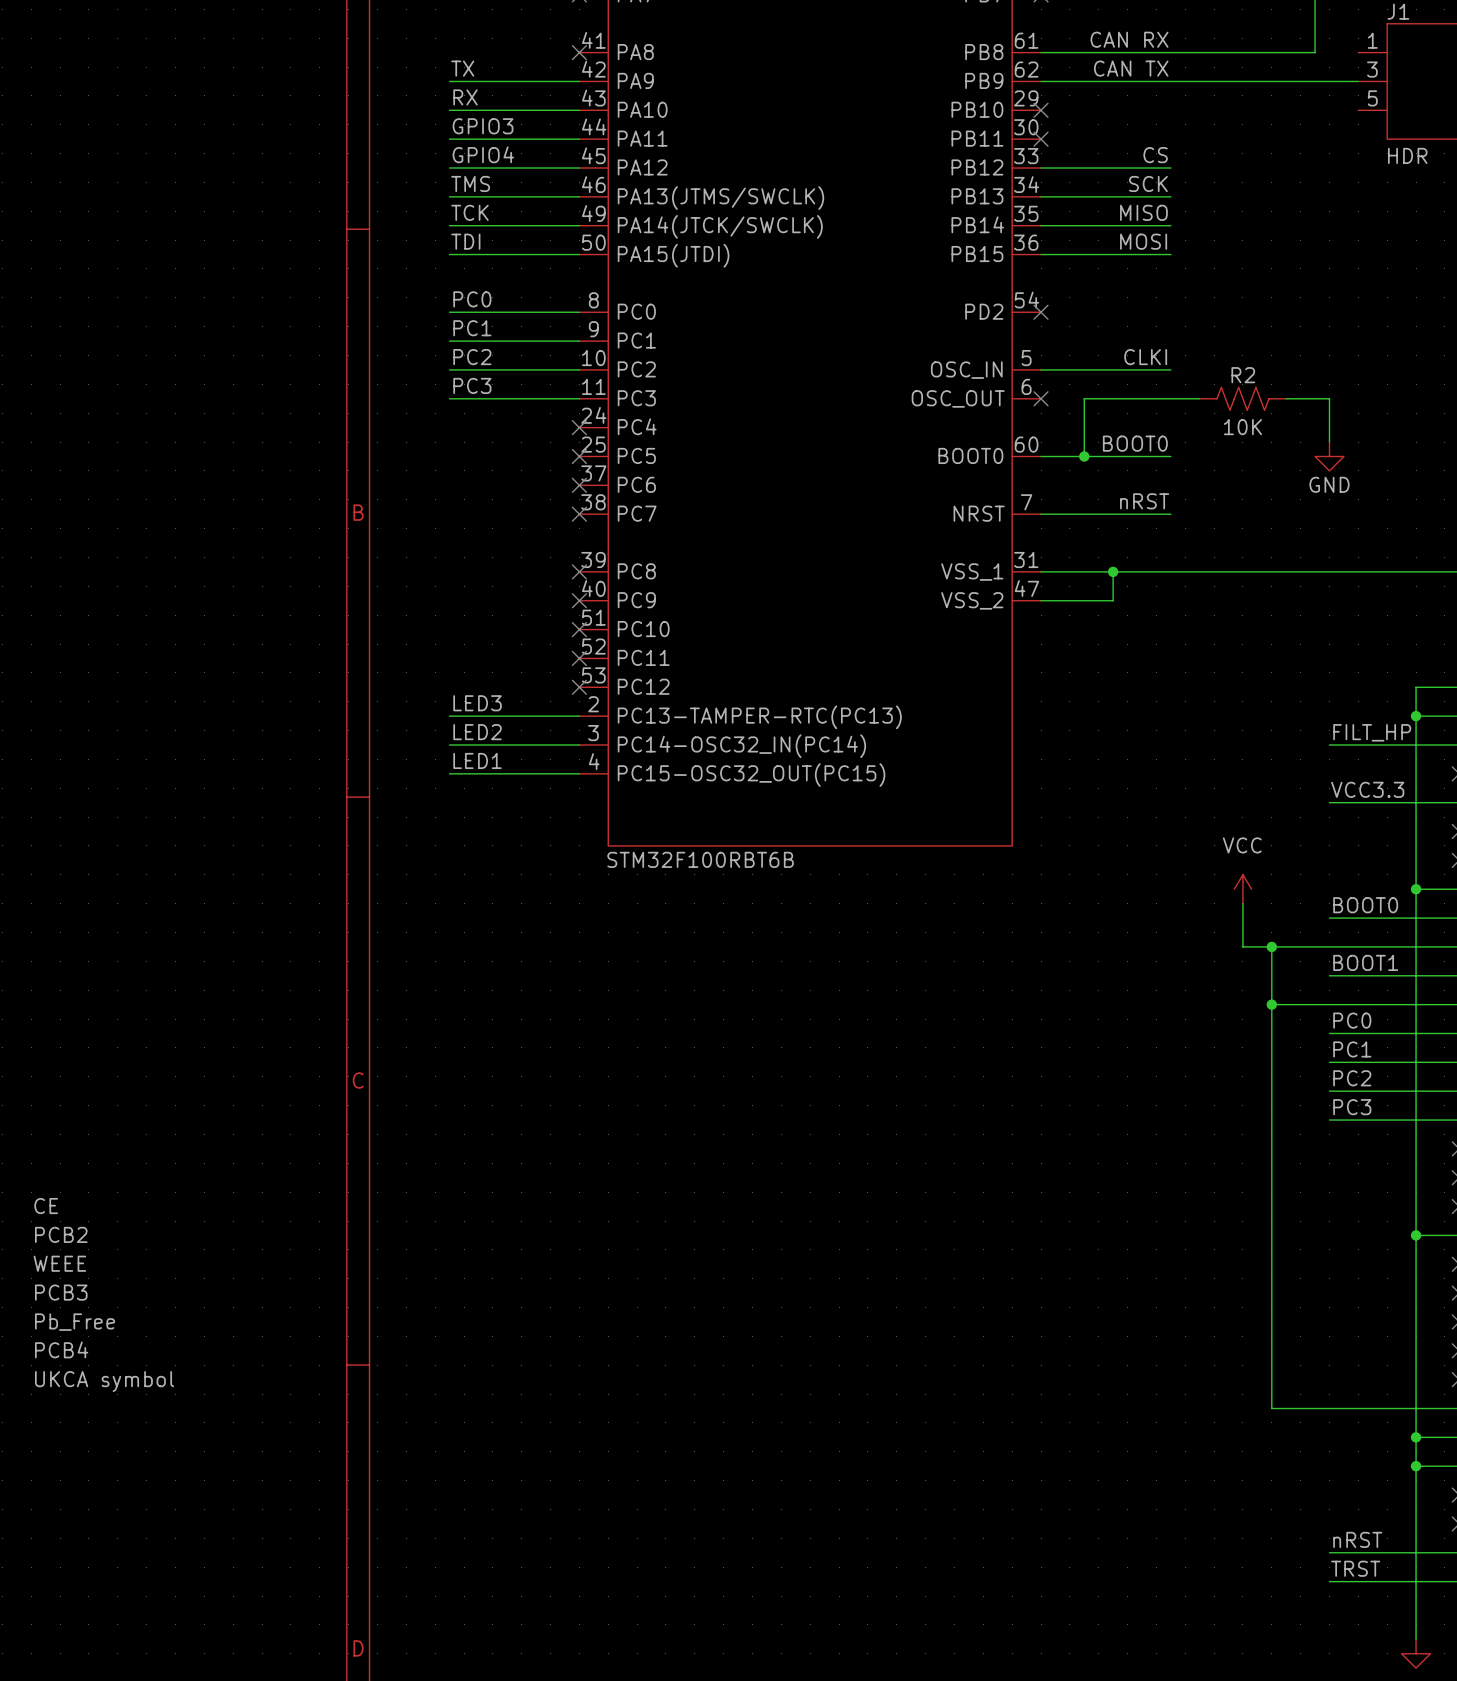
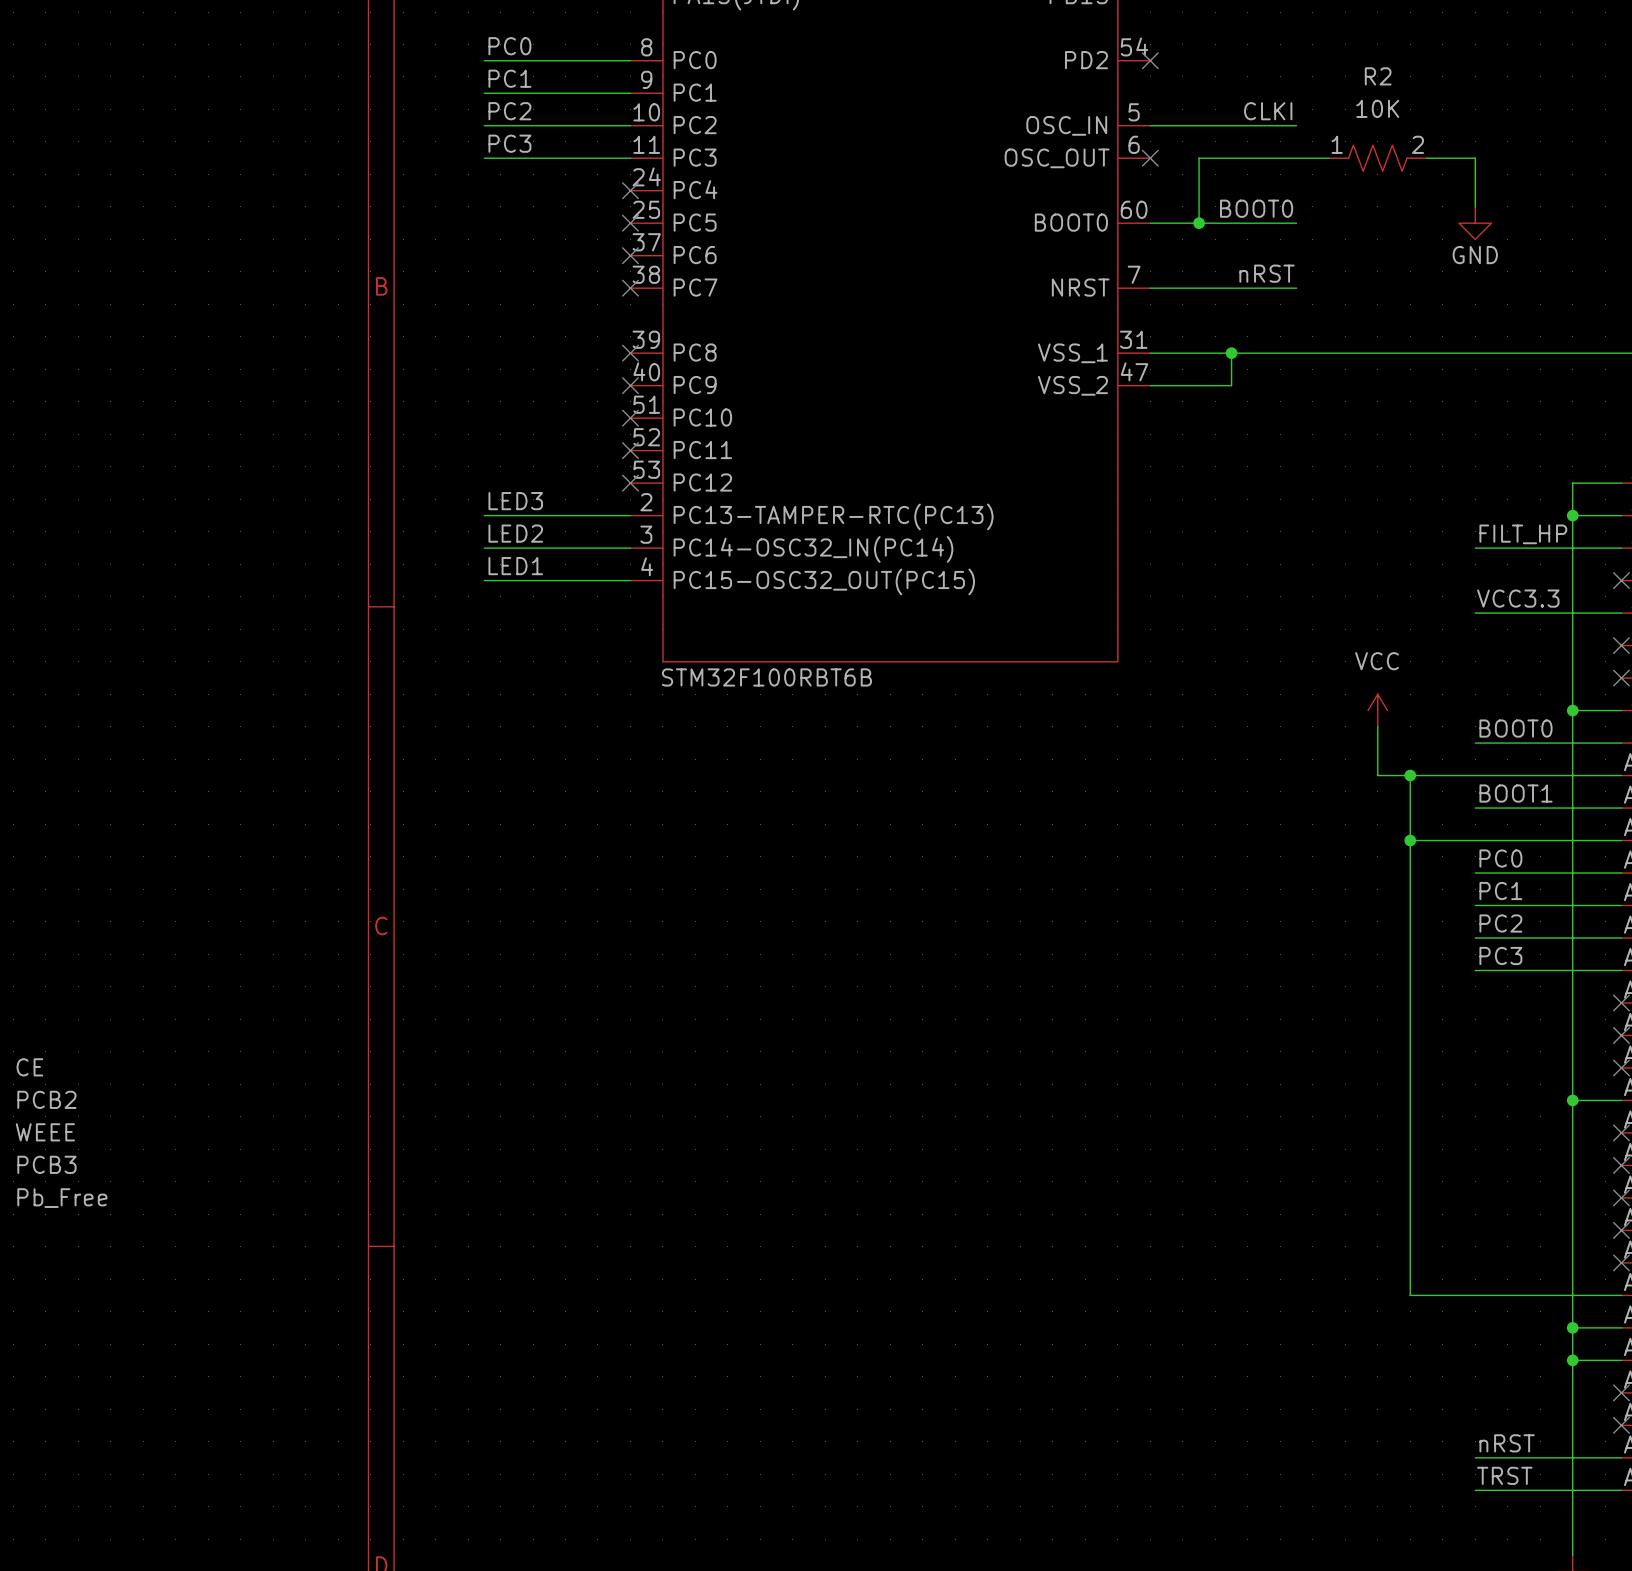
R2 name position: R2 (1243, 375) -> R2 (1378, 76)
R2 pin number: none -> 1 (1337, 144)
R2 pin number: none -> 2 (1418, 144)
R2 text position: 10K (1242, 427) -> 10K (1377, 108)
PCB4: UKCA symbol (104, 1366) -> none

